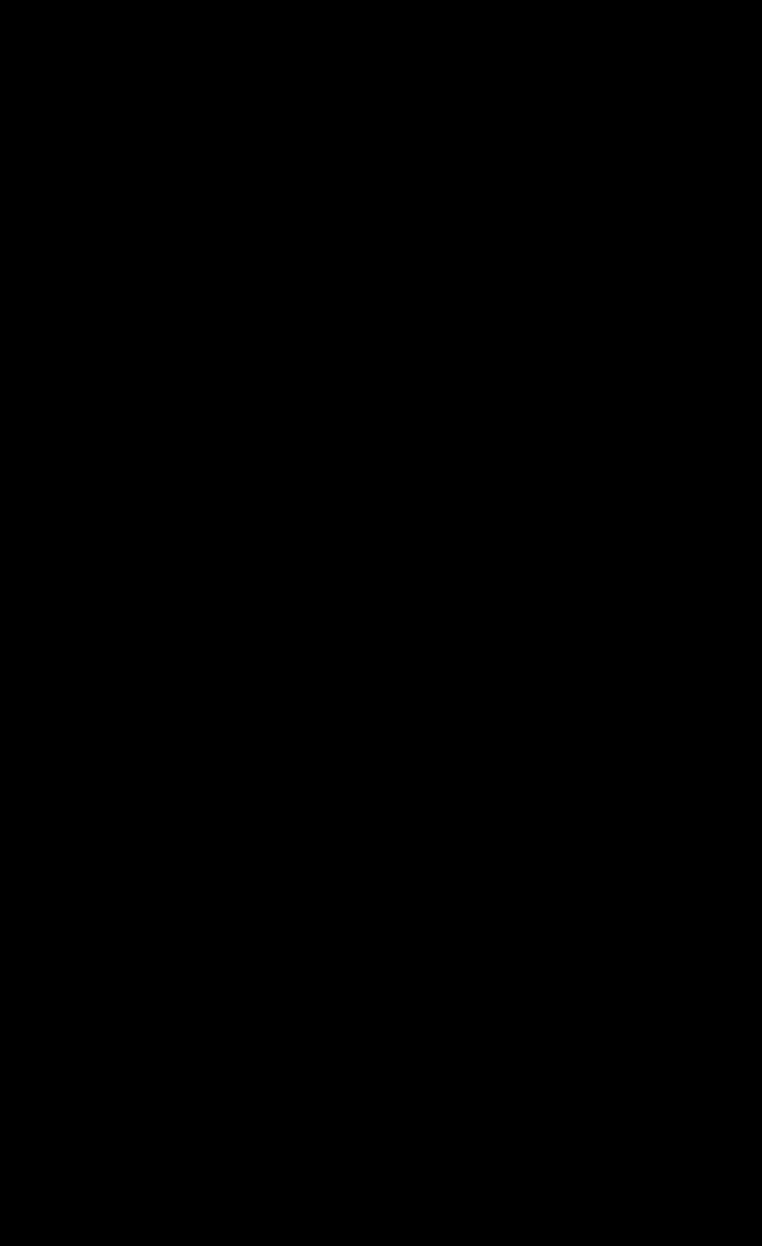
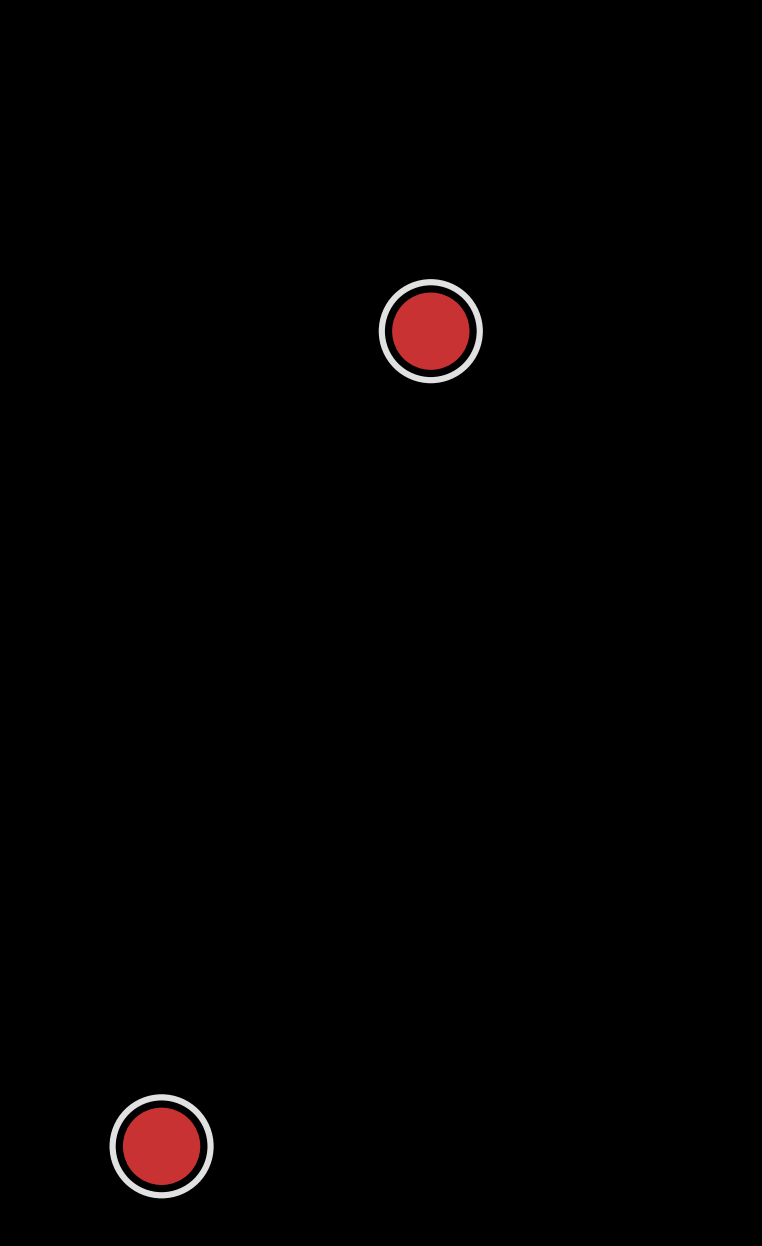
part: none -> (430, 331)
part: none -> (161, 1146)

